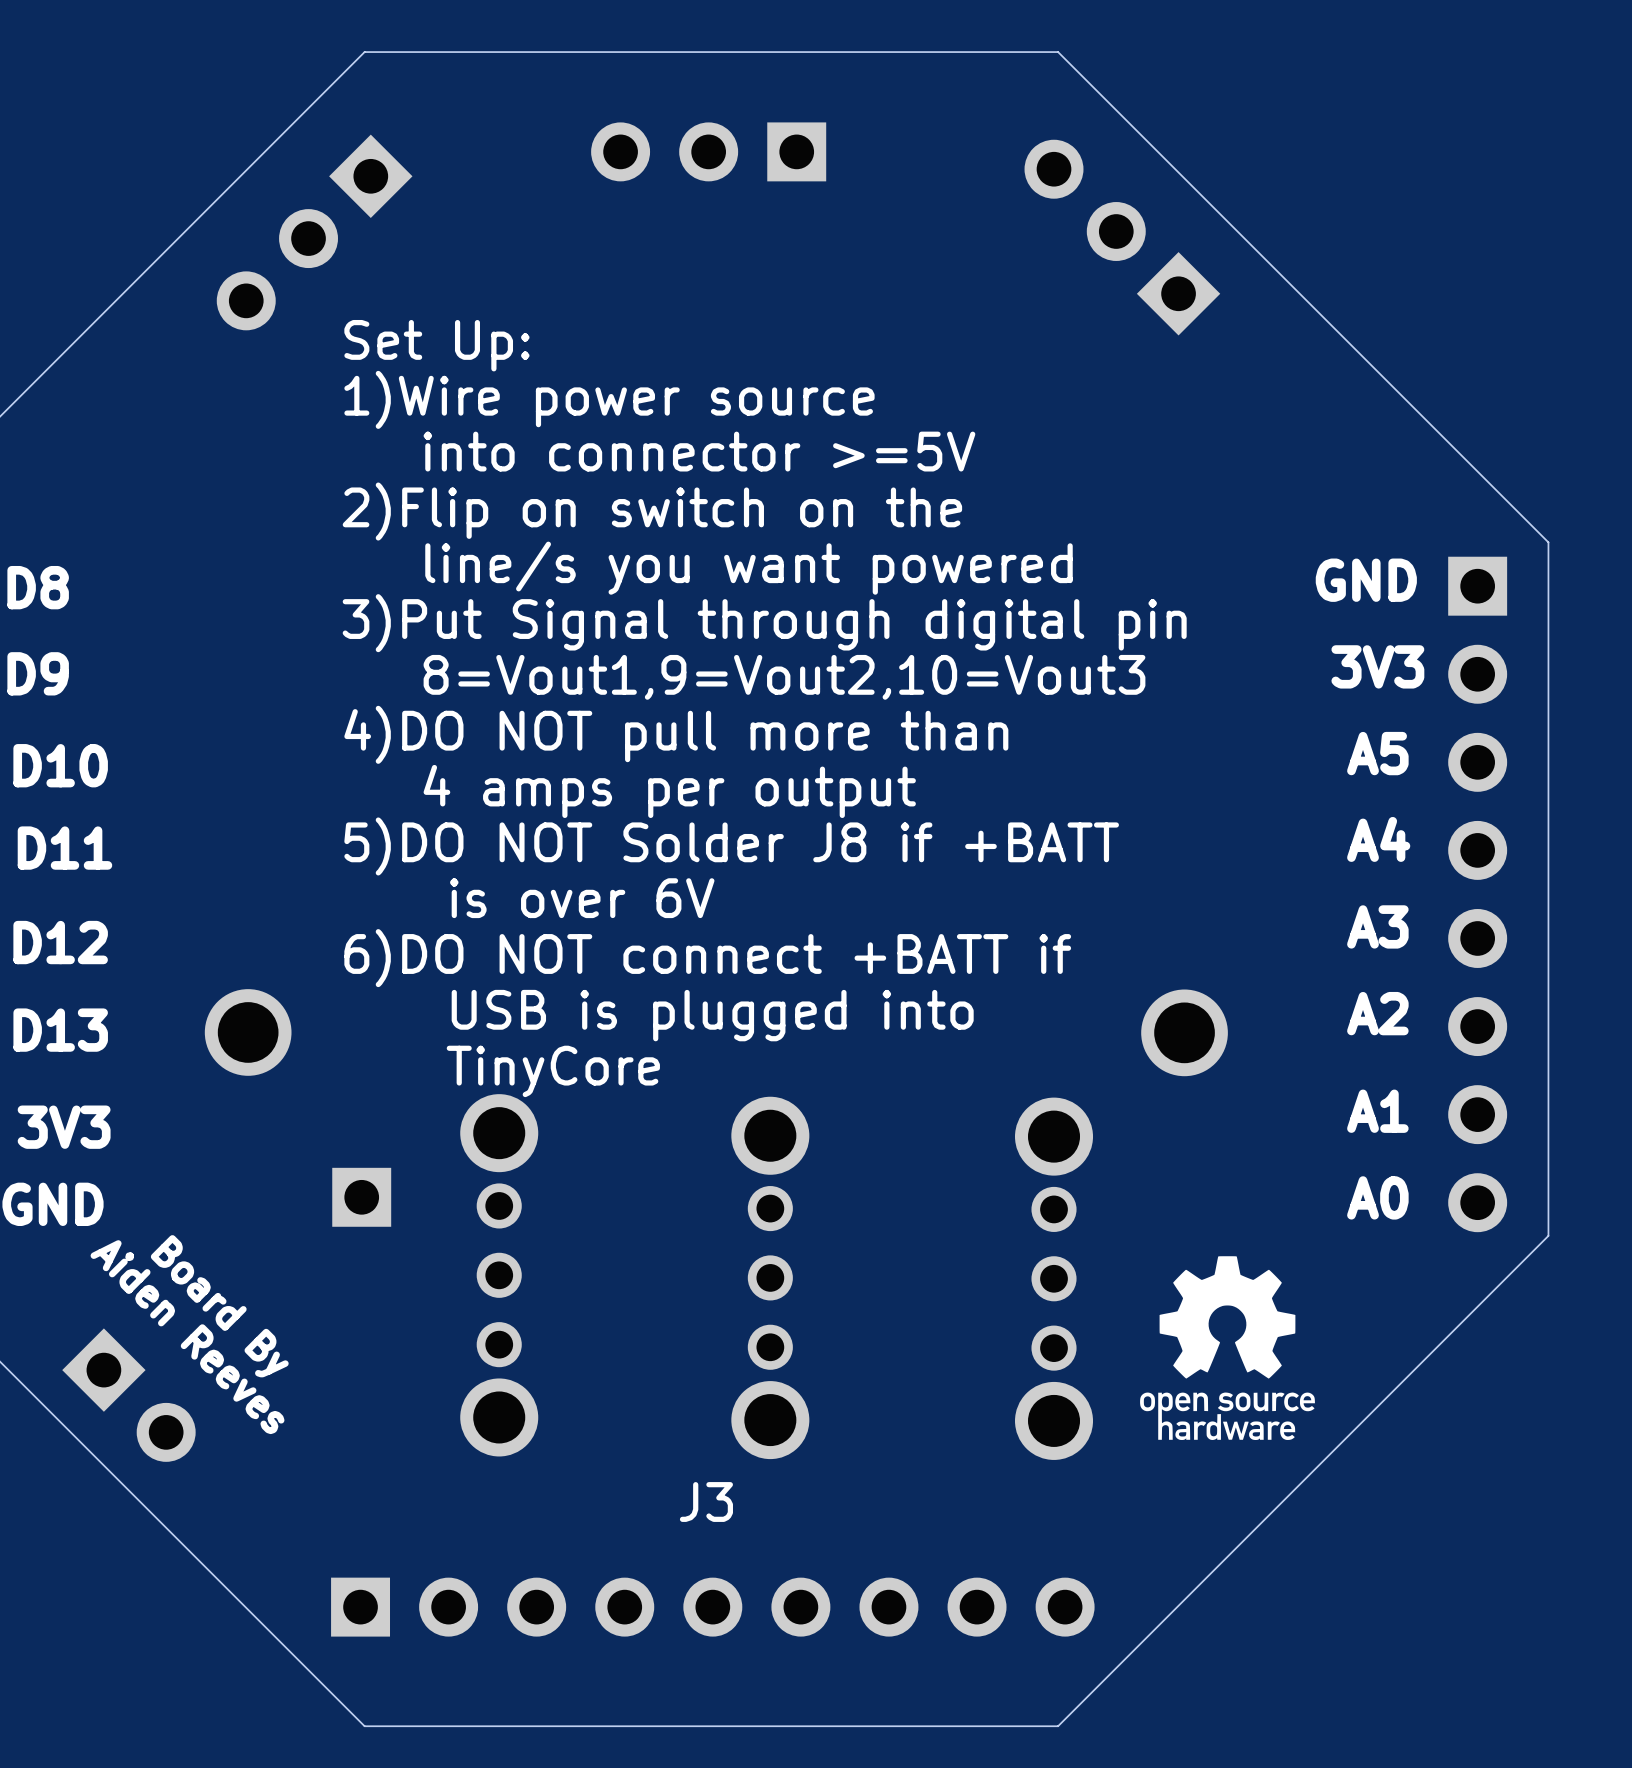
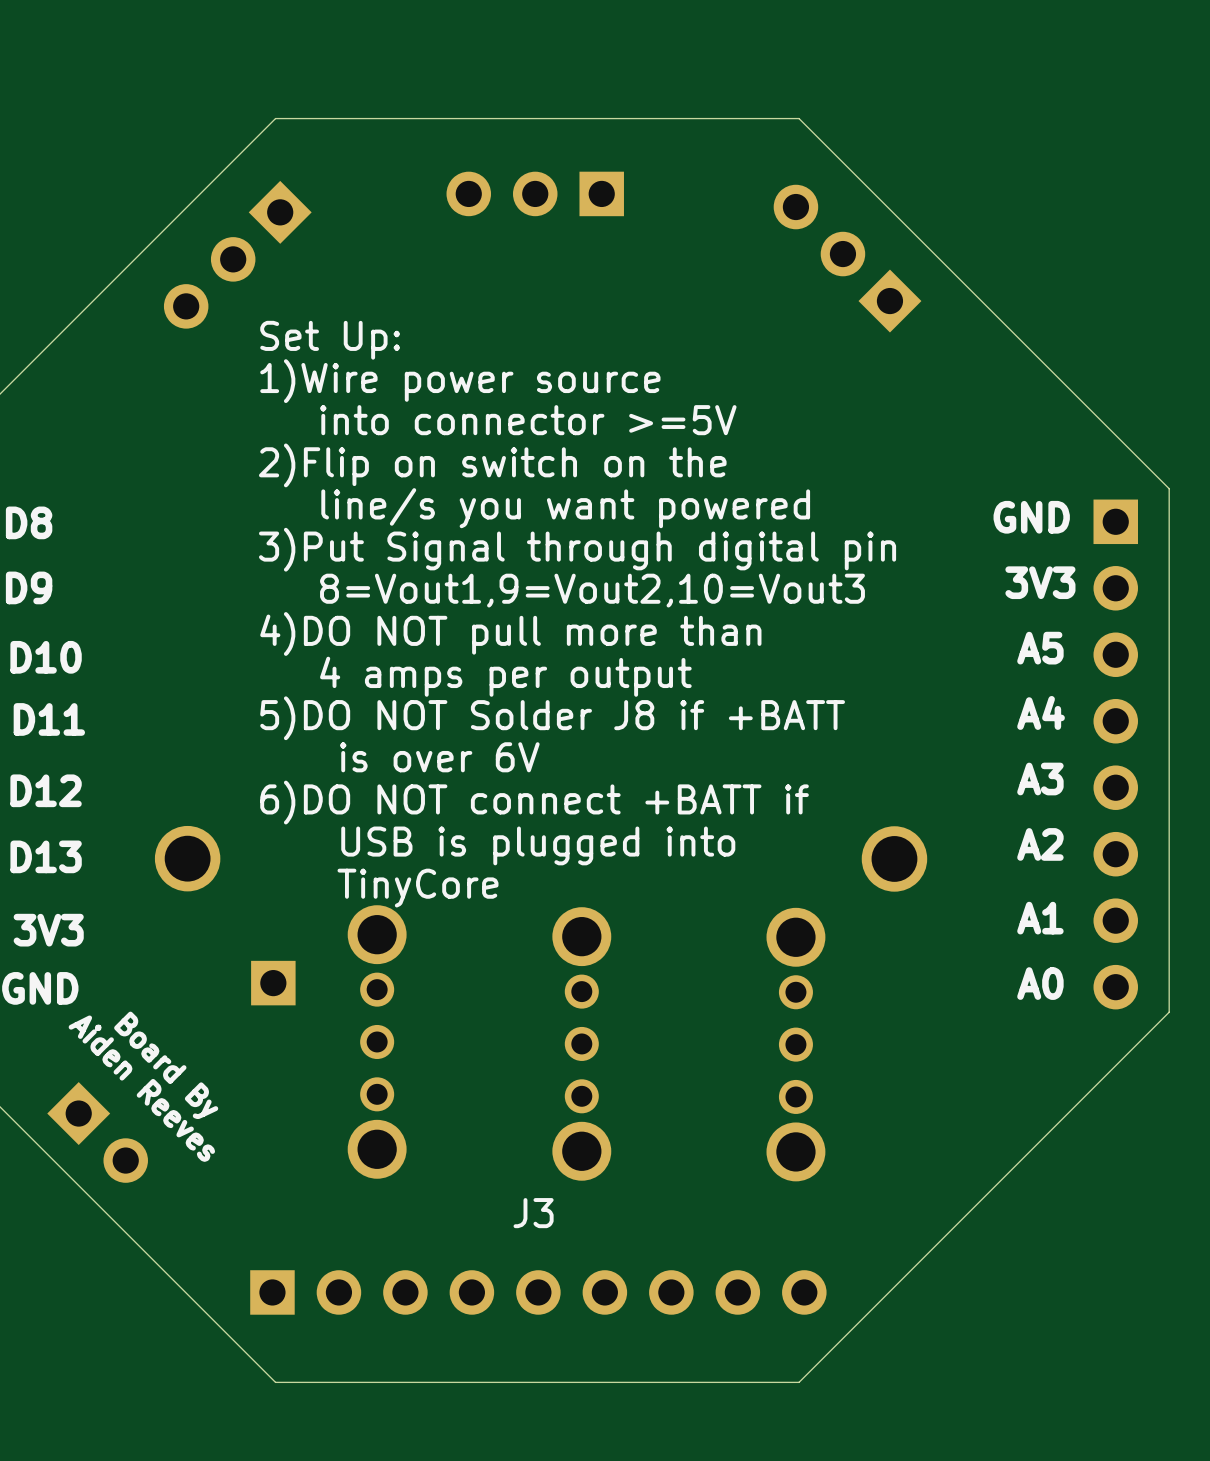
drawing: [1140, 1256, 1315, 1441] -> none

